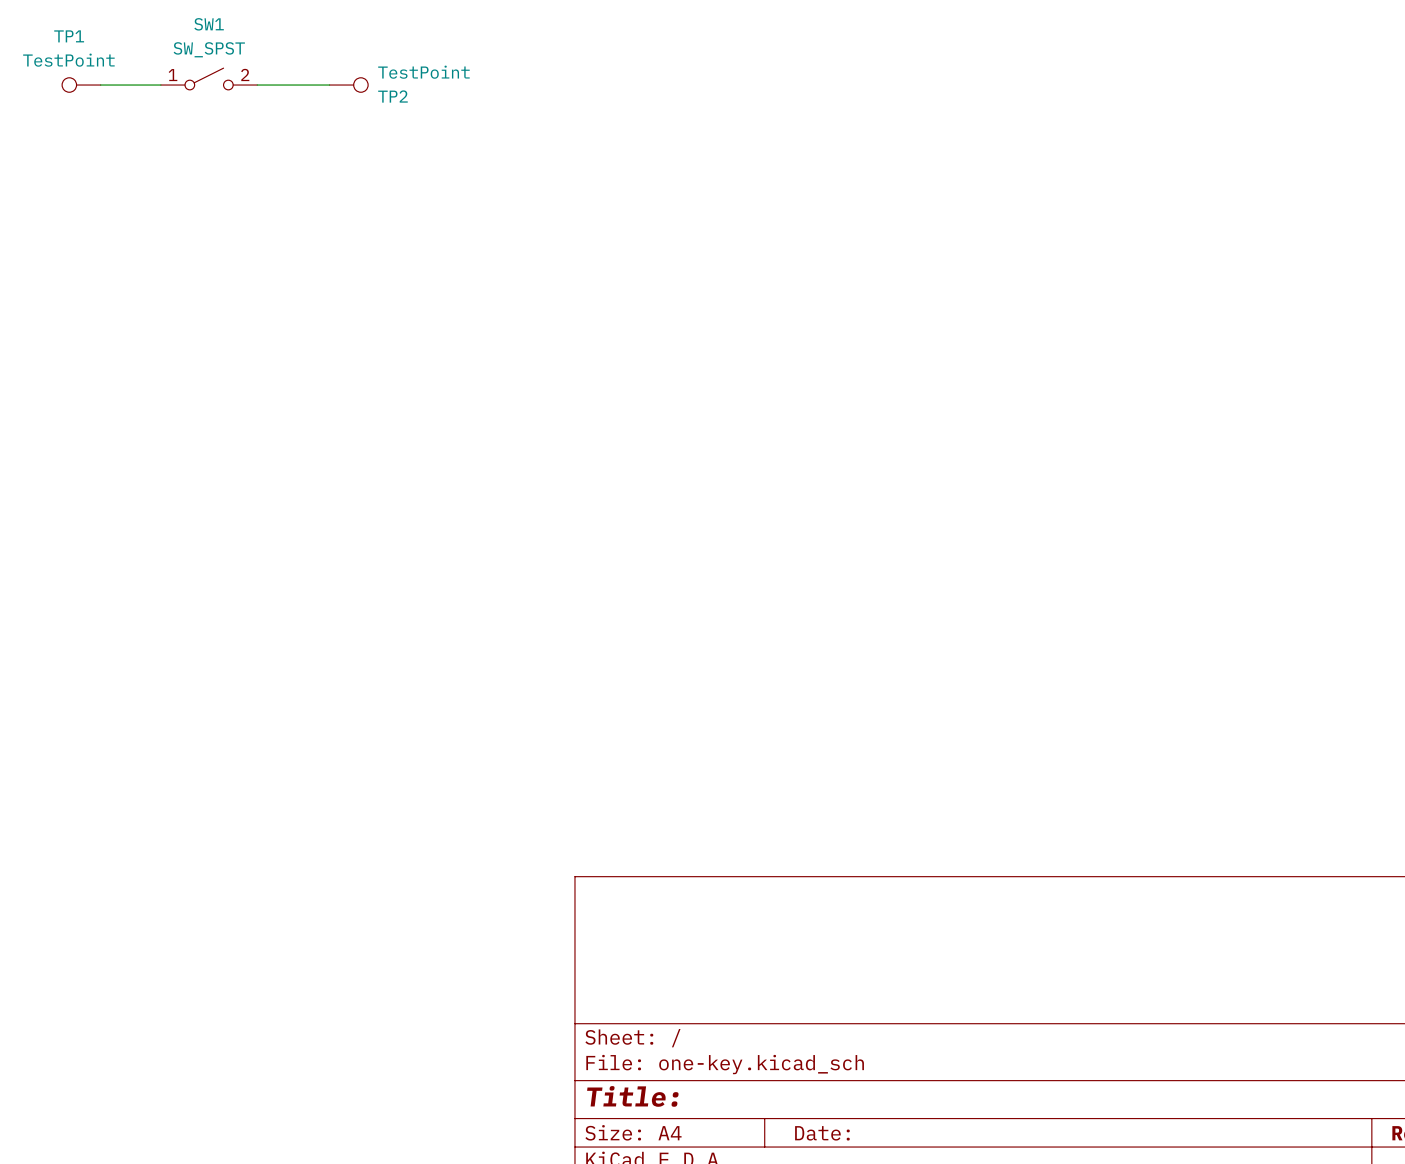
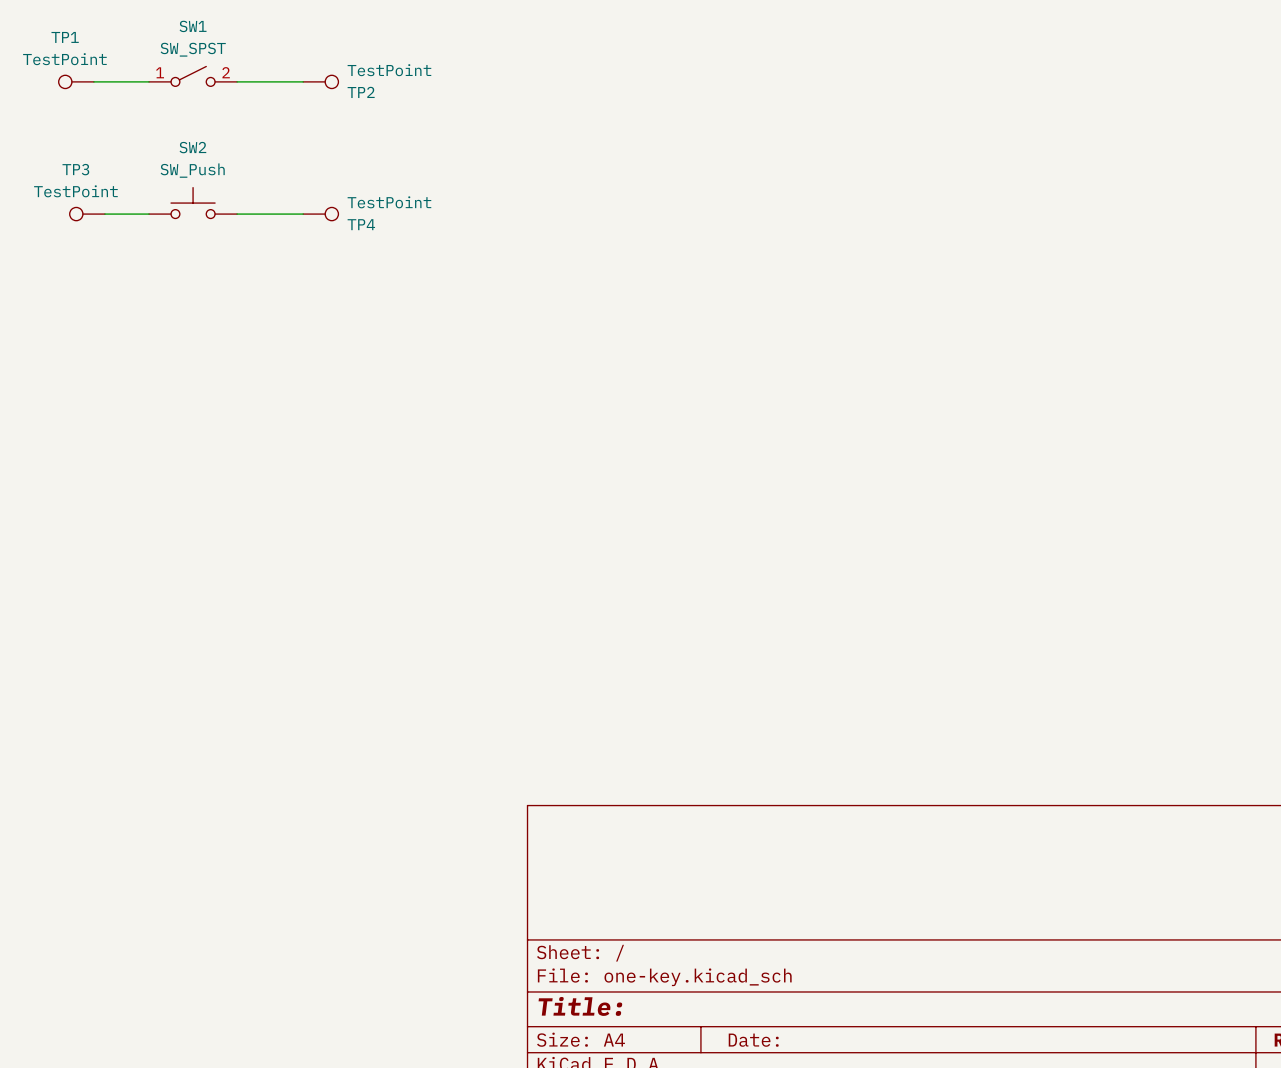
SW2: none -> SW_Push (193, 203)
TP3: none -> TestPoint (87, 214)
wire: none -> (104, 214) (149, 214)
wire: none -> (237, 214) (303, 214)
TP4: none -> TestPoint (320, 214)

